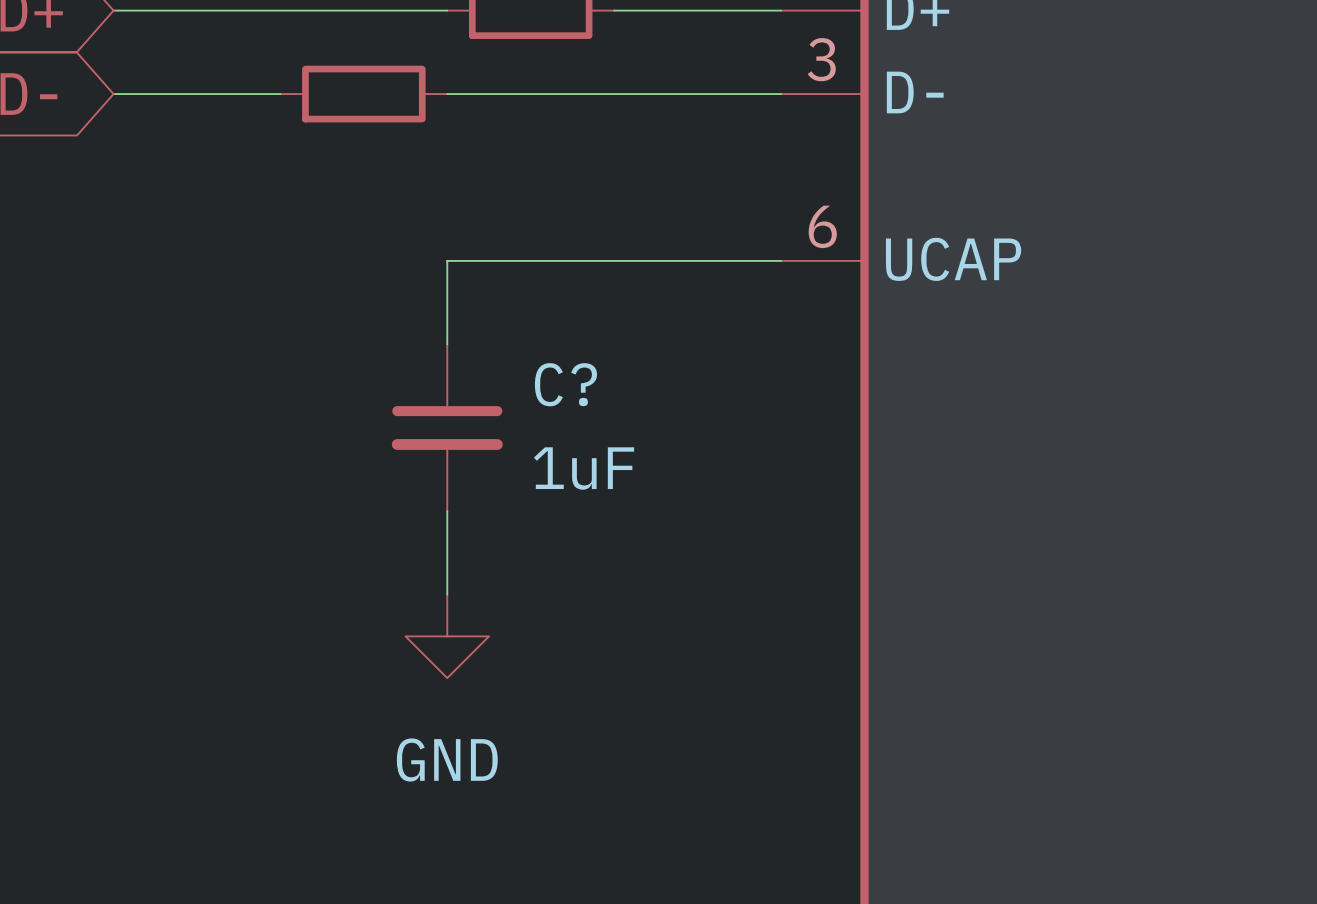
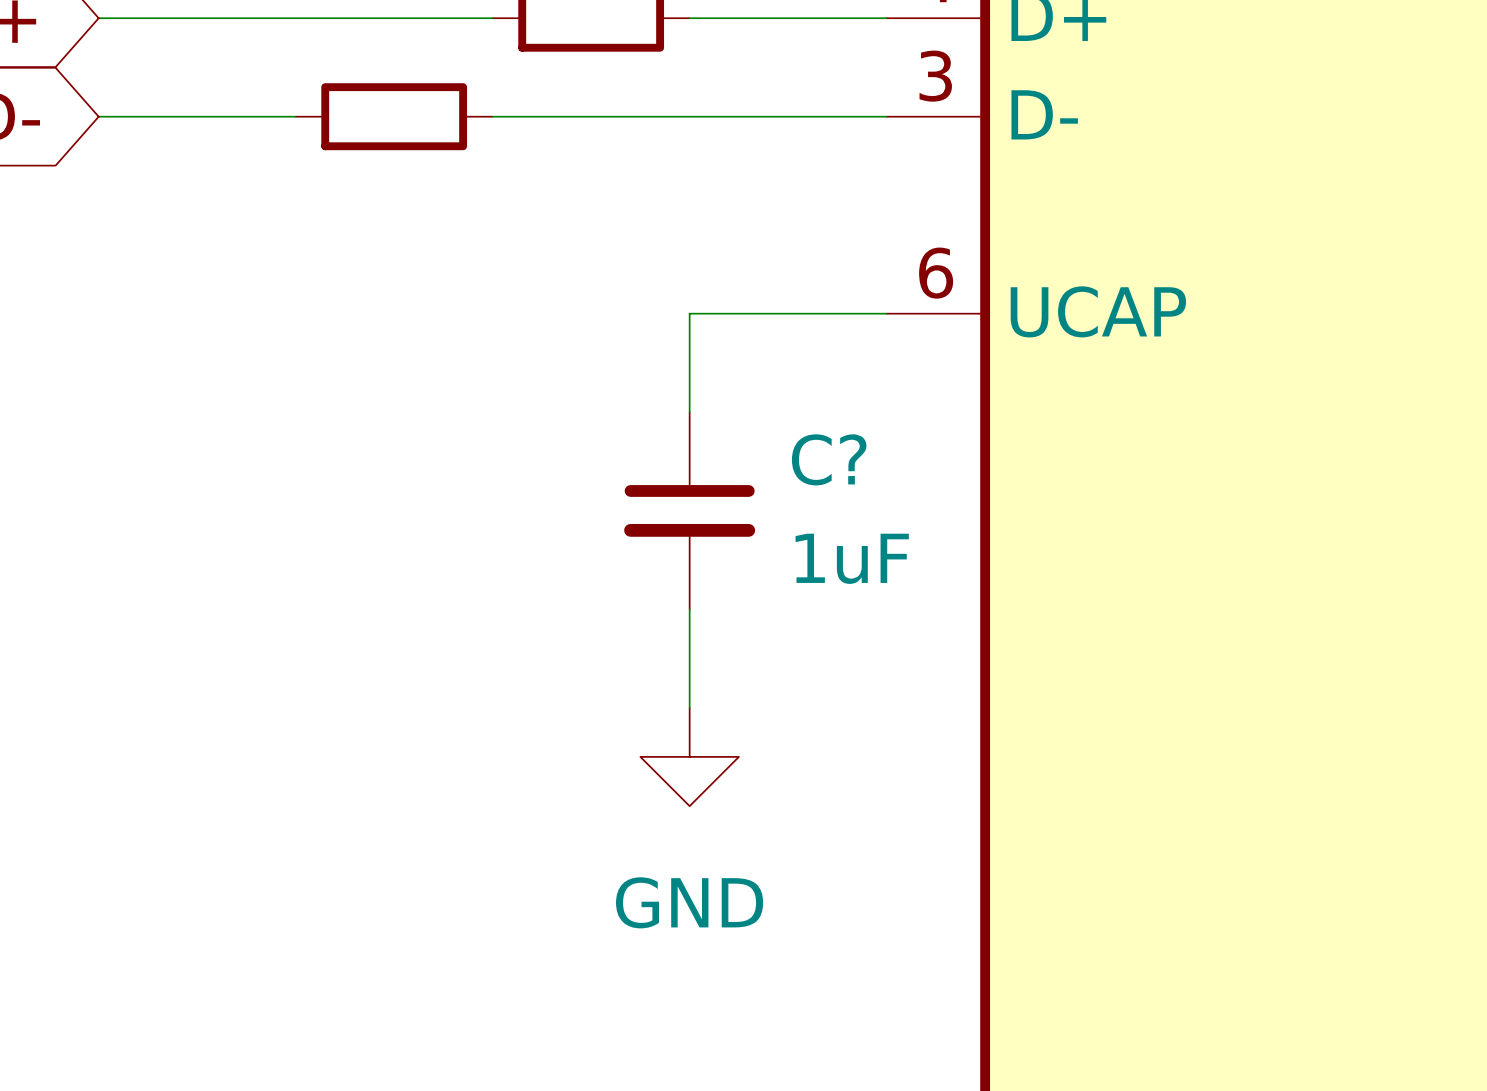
wire: (614, 260) (447, 260) (447, 344) -> (689, 313) (689, 412)
C? position: (447, 427) -> (689, 510)
wire: (447, 511) (447, 594) -> (689, 609) (689, 707)
power symbol position: GND (447, 636) -> GND (689, 756)

